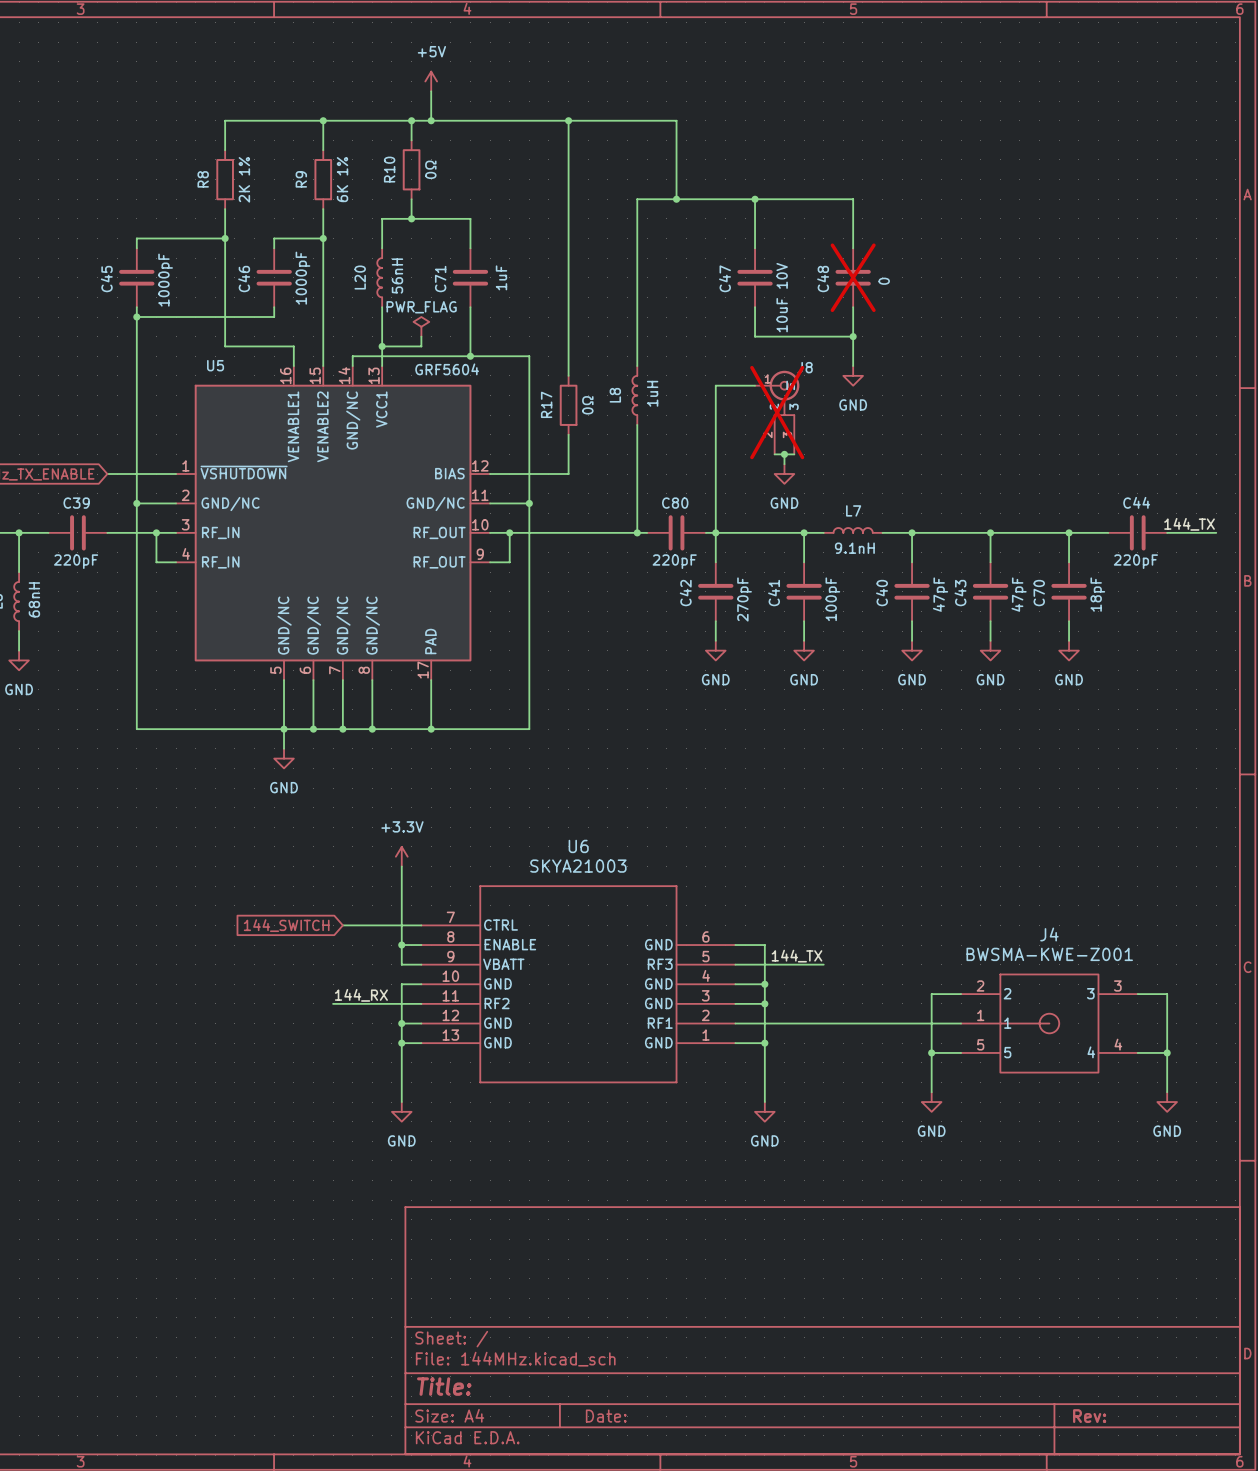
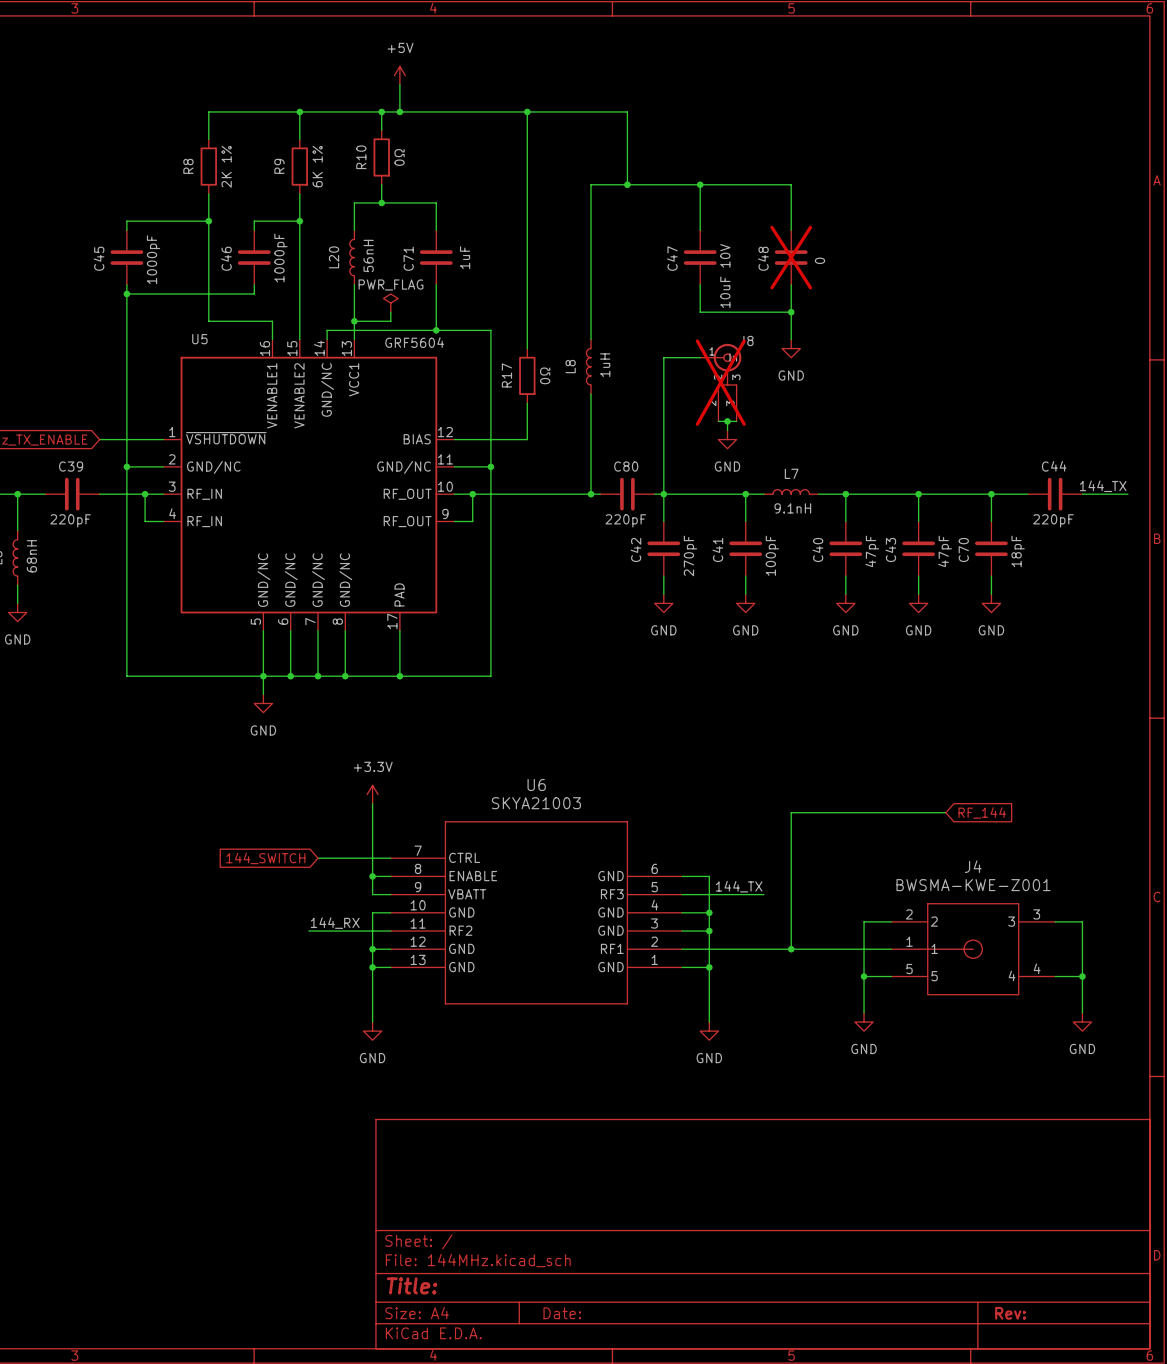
wire: none -> (945, 812) (791, 812) (791, 949)
global label: none -> RF_144 (982, 812)
junction: none -> (791, 949)

